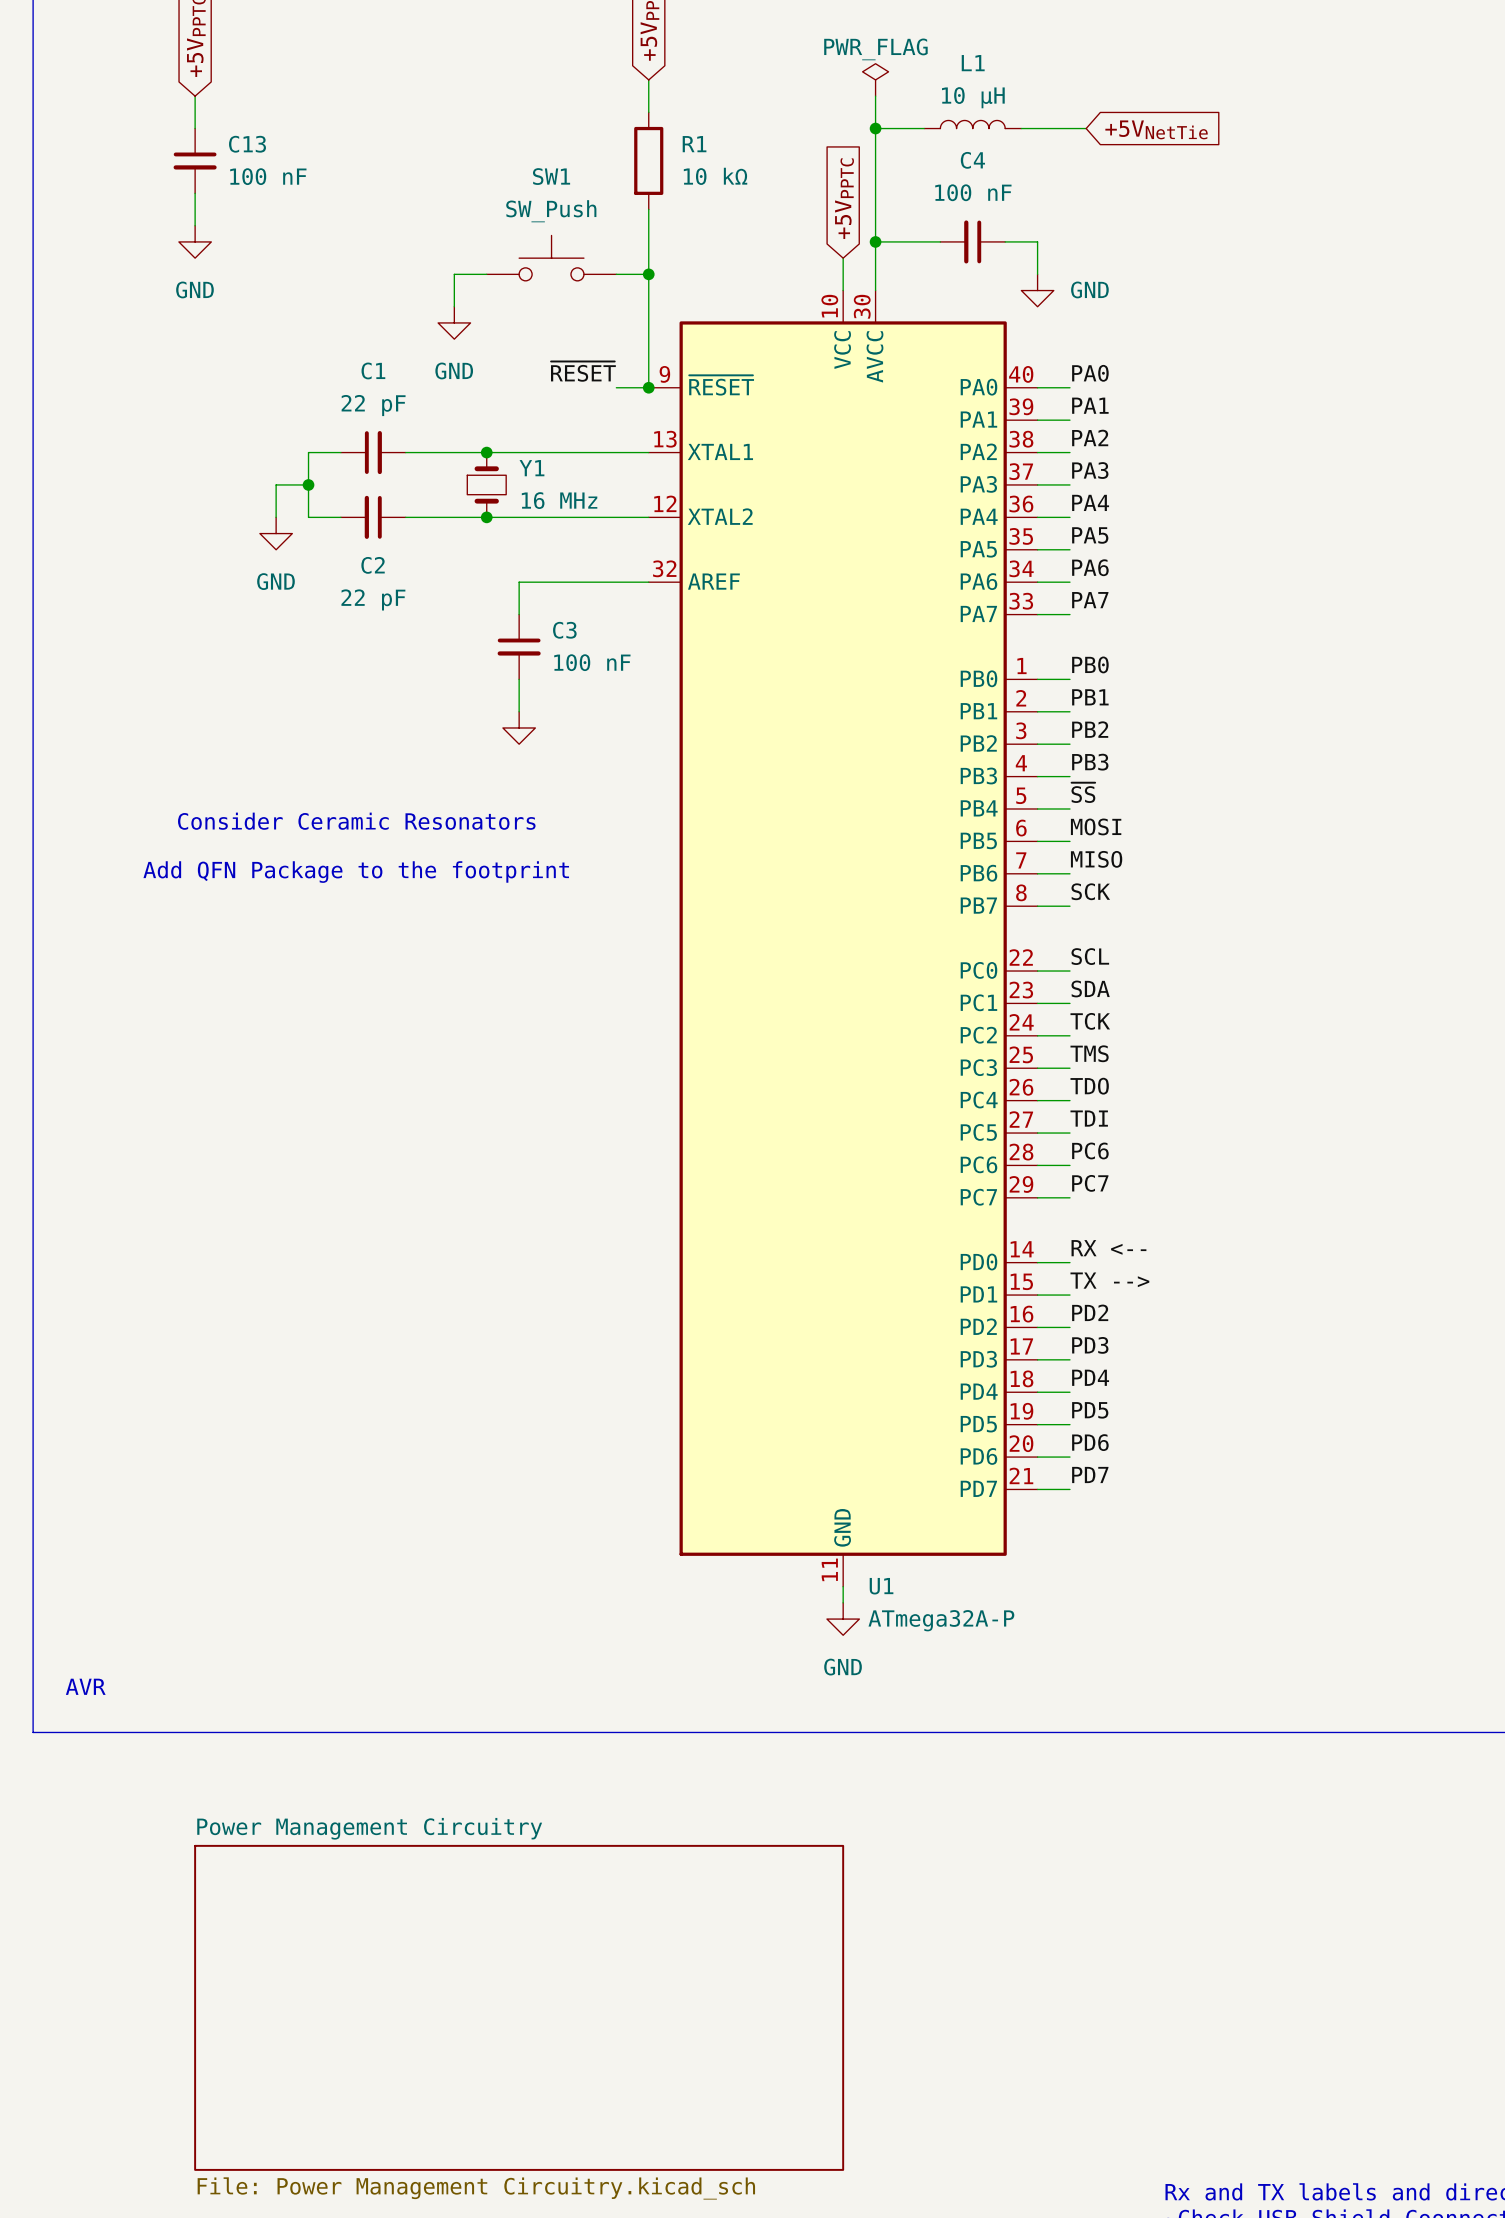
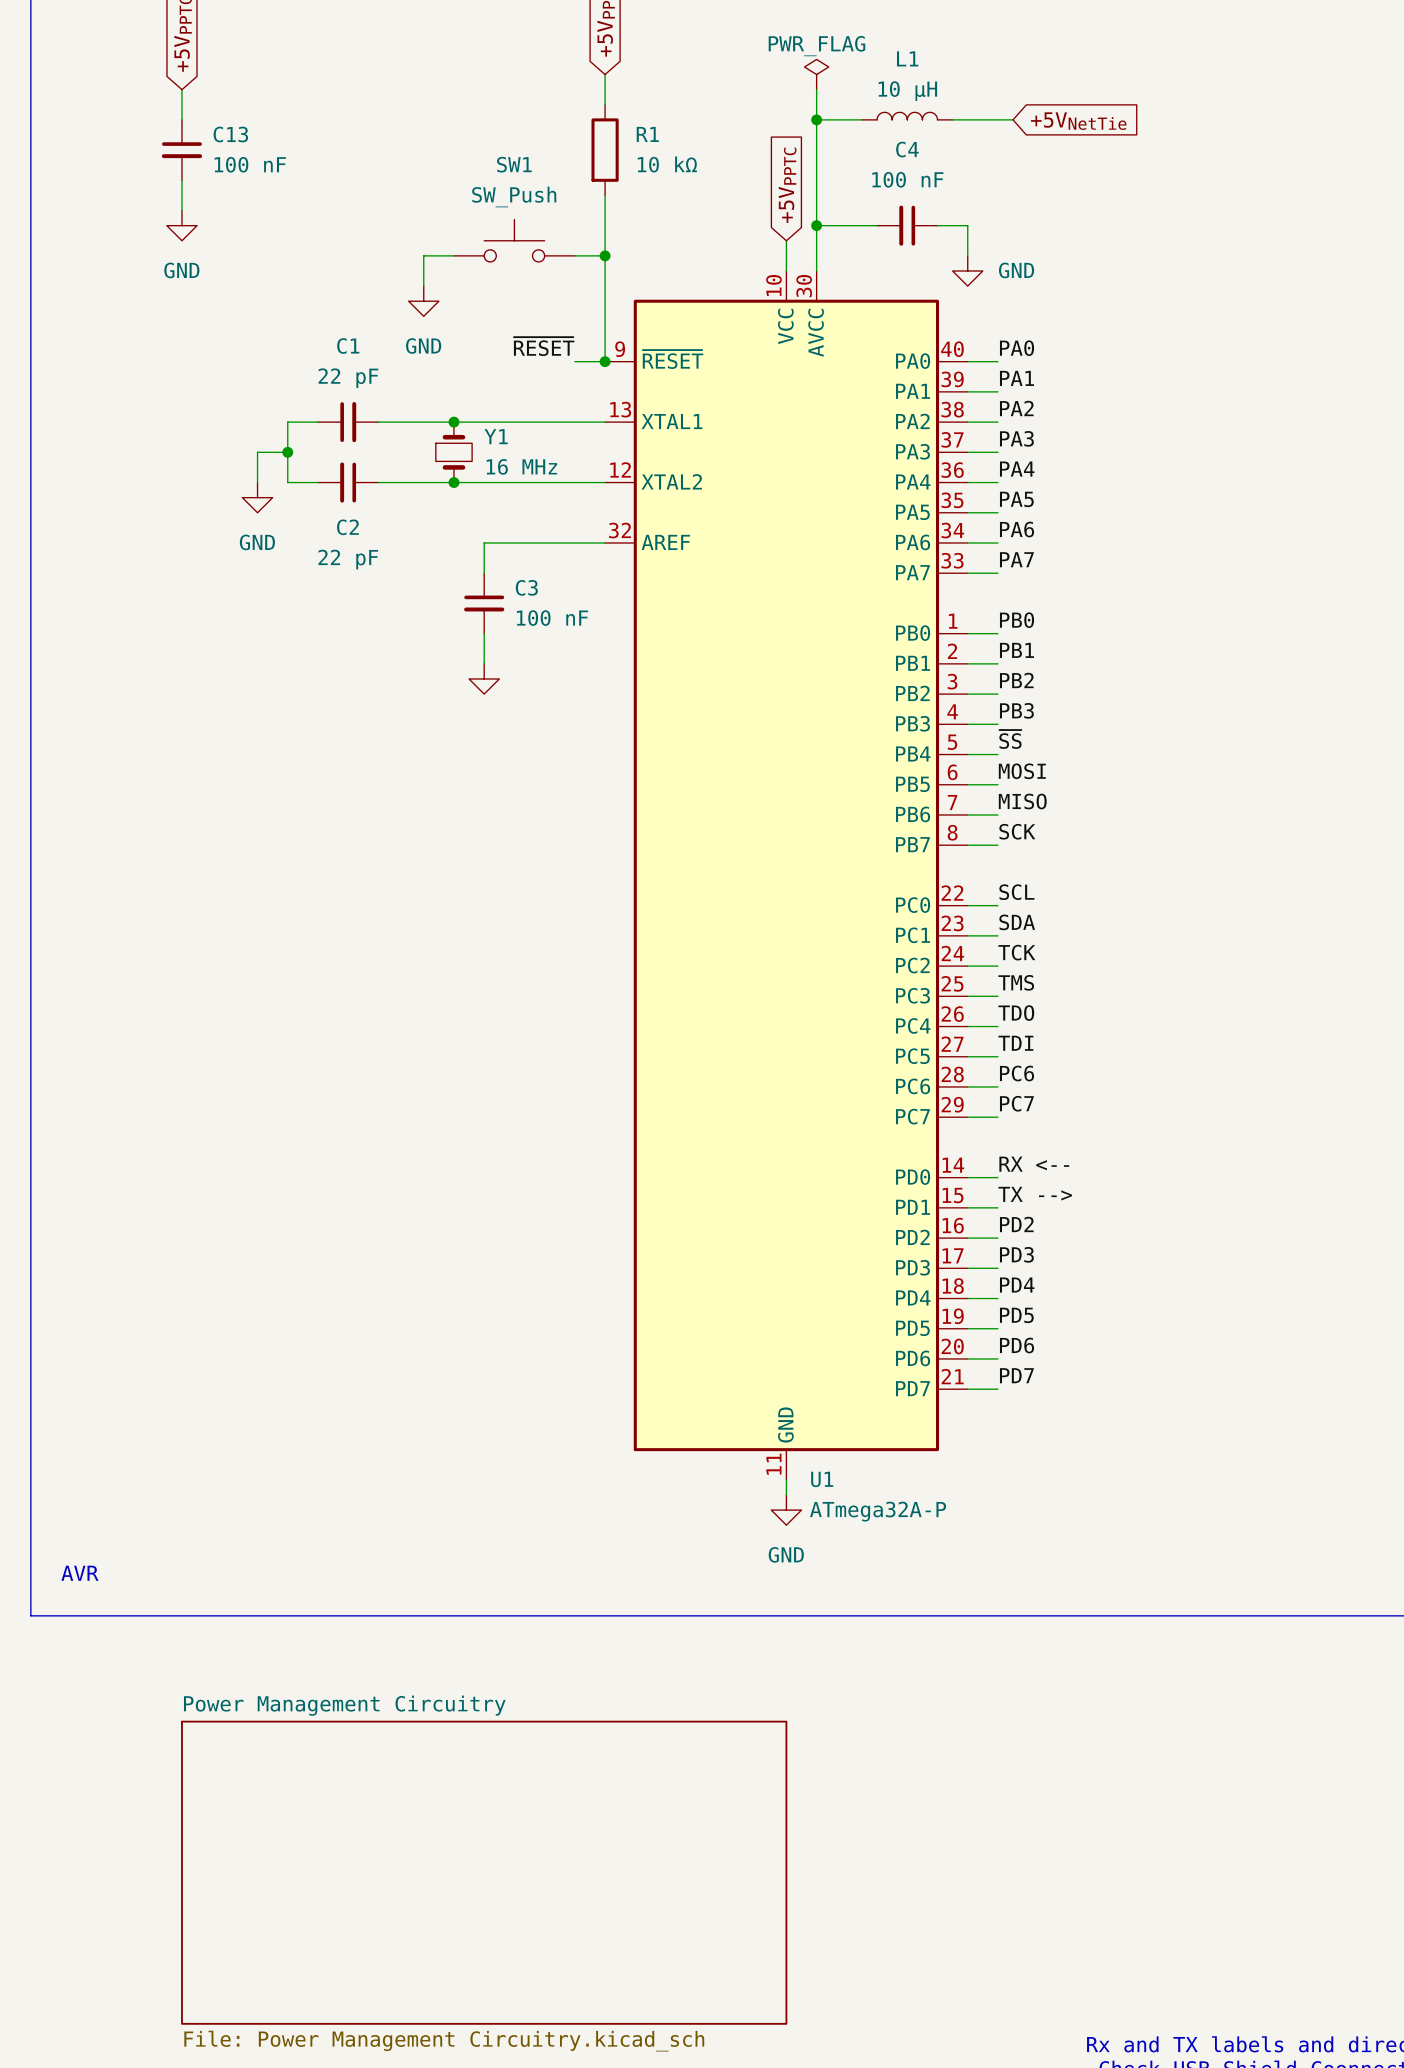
text: Consider Ceramic Resonators (356, 821) -> none
text: Add QFN Package to the footprint (356, 872) -> none

